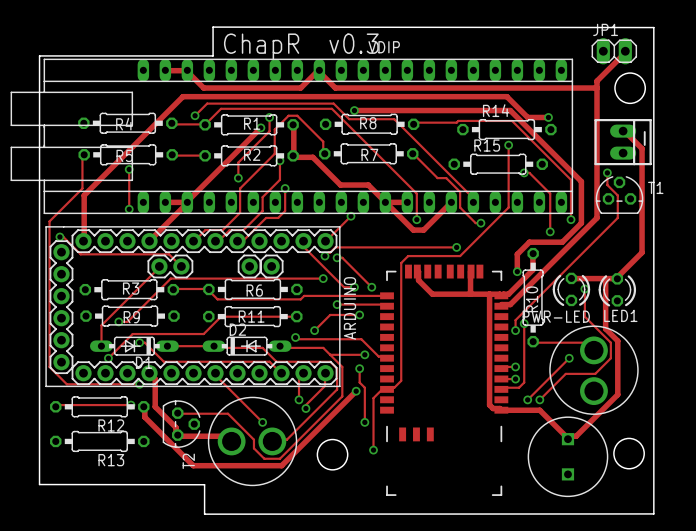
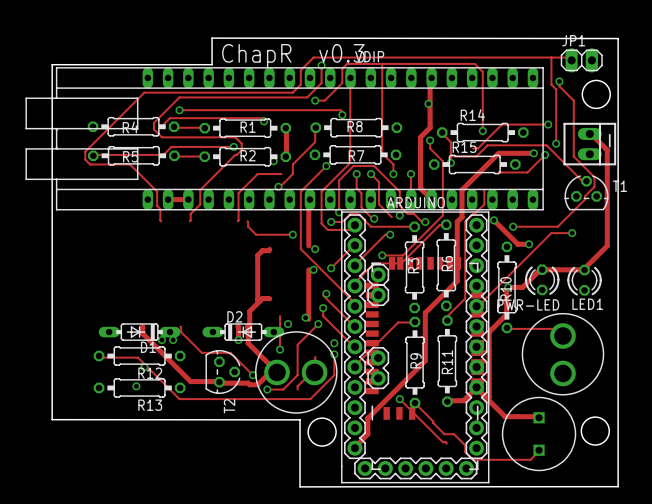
track: none -> (551, 57) (551, 84) (556, 89) (556, 143)
track: none -> (571, 60) (568, 57) (313, 57) (300, 70) (300, 84) (292, 92) (144, 92) (85, 151) (85, 159) (90, 164) (130, 164) (157, 191) (157, 205) (160, 209) (161, 221)
track: (625, 51) (597, 81) (597, 217) (510, 304) (501, 304) (501, 306) -> none
track: none -> (382, 63) (382, 153) (393, 164) (393, 174)
track: none -> (321, 65) (321, 83) (307, 97) (179, 97) (153, 122) (153, 129) (161, 137) (235, 137) (241, 143) (241, 150) (200, 190) (200, 204) (190, 213) (189, 221)
via: none -> (321, 65)
track: (165, 70) (187, 70) (203, 88) (300, 88) (319, 70) (335, 88) (597, 88) -> none
track: none -> (350, 77) (350, 162) (321, 191) (321, 223) (327, 229) (350, 229) (354, 225)
via: none -> (559, 81)
track: none -> (315, 100) (324, 100) (342, 83) (342, 68) (347, 63) (474, 63) (482, 71) (482, 130)
via: none -> (315, 100)
via: none -> (428, 103)
track: none -> (179, 110) (340, 110) (342, 111)
track: (354, 110) (510, 110) (581, 181) (581, 223) (562, 242) (529, 242) (517, 254) (517, 271) -> none
track: none -> (264, 118) (169, 118) (161, 126)
track: (195, 115) (207, 103) (333, 103) (349, 119) (394, 119) (472, 197) (473, 202) -> none
via position: (195, 115) -> (179, 110)
track: (269, 117) (269, 131) (238, 162) (238, 178) -> none
track: (548, 117) (527, 117) (506, 96) (182, 96) (84, 195) (83, 241) -> none
via: (548, 117) -> none
track: none -> (548, 124) (501, 124) (477, 148) (473, 148)
via: none -> (548, 124)
track: (205, 124) (221, 108) (331, 108) (389, 165) -> (339, 213) (339, 180) (353, 166) (374, 166)
track: none -> (315, 127) (315, 142) (292, 164) (292, 174) (281, 185)
track: (413, 124) (415, 122) (456, 122) (458, 120) (512, 120) (571, 179) (571, 219) -> none
track: (260, 127) (149, 241) -> none
via: (260, 127) -> none
track: none -> (442, 132) (450, 142) (450, 162)
track: none -> (430, 140) (430, 148) (442, 161) (442, 215) (402, 255) (382, 255)
via: none -> (430, 140)
via: none -> (556, 143)
via: none -> (233, 146)
track: (508, 145) (508, 191) -> none
via position: (508, 145) -> (482, 130)
track: none -> (533, 153) (498, 153) (462, 190) (462, 217) (457, 221) (457, 281) (425, 312) (425, 360) (367, 418) (367, 434) (354, 448)
via: none -> (533, 153)
track: (324, 153) (323, 141) (297, 115) (288, 115) (274, 129) (274, 153) (240, 188) (240, 212) (222, 230) (205, 230) (193, 241) -> none
track: (412, 153) (437, 178) (446, 178) (460, 191) (460, 207) (475, 223) (480, 223) -> none
via: none -> (545, 154)
track: (84, 154) (82, 155) (82, 188) (49, 221) (49, 366) (66, 384) (139, 384) -> (93, 155) (163, 154) (171, 146) (233, 146)
track: (293, 155) (312, 157) (340, 185) (368, 185) (385, 202) -> none
track: none -> (450, 156) (476, 156) (487, 145) (546, 145) (581, 180) (586, 181)
track: (279, 160) (279, 179) (262, 197) (262, 211) (243, 230) (229, 230) (219, 240) (215, 241) -> none
via: none -> (450, 162)
track: none -> (326, 166) (300, 191) (300, 249) (353, 301) (354, 306)
via: none -> (326, 166)
track: (129, 169) (129, 209) -> none
via: (129, 169) -> none
via: (524, 172) -> none
track: (529, 172) (550, 193) (550, 231) -> (503, 172) (527, 172) (545, 154)
track: (607, 172) (607, 185) (617, 195) (617, 198) -> (559, 81) (559, 86) (573, 100) (573, 156) (594, 177) (594, 186) (584, 196)
via: (607, 172) -> none
track: none -> (281, 174) (257, 174) (238, 193) (237, 221)
track: none -> (356, 174) (356, 188) (361, 193) (361, 207) (374, 218)
via: none -> (356, 174)
track: none -> (371, 174) (379, 182) (379, 204) (391, 217)
via: none -> (371, 174)
via: none -> (393, 174)
track: none -> (410, 174) (411, 199)
via: none -> (410, 174)
via: (238, 178) -> none
track: (285, 188) (285, 211) (278, 217) (266, 217) (243, 240) (237, 241) -> none
track: none -> (309, 199) (308, 245)
track: (385, 202) (413, 230) (423, 230) (451, 202) -> (431, 77) (430, 78) (430, 127) (420, 137) (420, 188) (431, 199)
track: (385, 202) (407, 202) -> none
track: (617, 202) (617, 217) (515, 320) (515, 330) -> (584, 199) (557, 226) (513, 226)
via: (129, 209) -> none
track: (416, 209) (416, 219) -> (399, 205) (407, 213) (414, 213) (422, 221) (425, 221)
track: (350, 216) (325, 241) -> none
track: (498, 217) (460, 256) (408, 256) (401, 263) (401, 380) (394, 387) (382, 389) (373, 398) (373, 450) -> (474, 213) (465, 221) (465, 298) (447, 316) (447, 320)
via: (571, 219) -> none
via: none -> (374, 218)
via: (480, 223) -> none
track: none -> (493, 220) (517, 244) (529, 244)
via: none -> (493, 220)
track: none -> (247, 221) (248, 226) (256, 234) (292, 234)
track: none -> (331, 221) (342, 221) (350, 213) (358, 213) (371, 226) (414, 226)
via: none -> (331, 221)
via: none -> (425, 221)
track: none -> (446, 224) (439, 225) (401, 263) (374, 263) (355, 282) (354, 286)
via: none -> (513, 226)
via: (550, 231) -> none
track: (59, 237) (63, 237) (80, 254) (169, 254) (181, 266) -> none
via: (59, 237) -> none
track: none -> (572, 233) (551, 233) (476, 306)
via: none -> (572, 233)
via: none -> (292, 234)
track: none -> (390, 234) (385, 234) (354, 265)
via: none -> (390, 234)
track: (303, 241) (304, 247) (344, 287) (354, 287) -> none
track: (456, 247) (335, 247) (325, 256) -> none
via: (456, 247) -> none
via: none -> (529, 244)
track: none -> (354, 245) (331, 268)
track: (533, 253) (532, 269) (508, 294) (501, 295) (499, 294) (432, 294) (418, 280) (417, 271) -> none
track: none -> (269, 249) (262, 250) (257, 255) (257, 300) (259, 301)
track: (337, 257) (342, 257) (371, 287) -> none
via: (337, 257) -> none
via: none -> (382, 255)
track: (159, 266) (101, 325) (101, 346) -> none
track: (471, 271) (470, 294) -> none
via: (517, 271) -> none
via: none -> (331, 268)
track: none -> (308, 269) (308, 319)
track: (323, 278) (170, 278) (127, 321) (118, 321) -> none
track: none -> (542, 269) (522, 287) (506, 288) (506, 314) (489, 332) (489, 397) (487, 399)
track: (605, 278) (605, 328) (617, 340) (617, 394) (576, 436) (569, 436) (567, 439) -> none
via: (354, 287) -> none
via: (371, 287) -> none
track: (584, 288) (584, 316) (610, 342) (610, 358) (595, 373) (565, 373) (539, 399) -> none
via: (584, 288) -> none
R3 rotation: 0° (129, 289) -> 90° clockwise (414, 267)
R3 position: (129, 289) -> (414, 267)
track: (173, 289) (207, 288) (217, 299) (300, 299) (304, 295) (387, 295) -> none
R6 rotation: 0° (252, 289) -> 90° clockwise (446, 265)
R6 position: (252, 289) -> (446, 265)
track: (489, 294) (489, 405) (493, 408) (501, 410) (539, 410) (567, 437) -> (447, 401) (463, 400) (476, 387) (505, 416) (538, 416)
via: none -> (508, 287)
track: (337, 304) (385, 304) (387, 306) -> none
ARDUINO: (192, 306) -> none
track: none -> (323, 295) (354, 326)
track: none -> (269, 298) (262, 298) (249, 311) (249, 325) (247, 326) (248, 343) (277, 372) (272, 370) (257, 384) (190, 381) (142, 333) (142, 326)
track: (359, 314) (330, 314) (314, 330) -> none
via: (359, 314) -> none
R9 rotation: 0° (130, 316) -> 90° clockwise (415, 362)
R9 position: (130, 316) -> (415, 362)
R11 rotation: 0° (252, 316) -> 90° clockwise (447, 361)
R11 position: (252, 316) -> (447, 361)
track: (296, 316) (221, 316) (203, 334) (132, 334) (108, 358) -> none
track: none -> (323, 308) (323, 316) (354, 346)
via: none -> (323, 308)
via: (118, 321) -> none
track: (524, 323) (524, 382) (519, 387) (501, 387) (501, 389) -> none
via: (524, 323) -> none
track: none -> (280, 316) (280, 349)
via: (515, 330) -> none
track: none -> (415, 322) (398, 322) (354, 367)
track: (295, 337) (297, 339) (361, 339) (378, 356) (387, 358) -> none
track: none -> (318, 324) (297, 344) (297, 375) (283, 389) (267, 389)
via: none -> (318, 324)
track: none -> (180, 326) (181, 332) (201, 352) (230, 352) (252, 375)
track: none -> (237, 326) (238, 340)
track: (139, 342) (144, 342) (163, 361) (269, 361) (281, 373) -> none
via: (139, 342) -> none
track: (167, 346) (262, 347) (276, 361) (330, 361) (337, 368) (337, 389) (286, 439) (273, 439) (272, 441) -> none
track: (280, 346) (281, 347) (323, 347) (342, 366) (342, 396) -> (334, 354) (334, 375) (331, 378)
via: none -> (161, 340)
via: none -> (173, 340)
via: none -> (238, 340)
track: (330, 354) (364, 354) -> none
via: (364, 354) -> none
via: (108, 358) -> none
via: none -> (334, 343)
track: (569, 358) (527, 399) -> none
via: (569, 358) -> none
ARDUINO: none -> (415, 347)
via: none -> (280, 349)
via: (515, 366) -> none
track: (359, 368) (359, 382) (364, 387) (364, 422) -> none
via: (359, 368) -> none
via: none -> (334, 354)
track: (149, 373) (155, 379) (155, 406) (176, 427) (177, 435) (227, 436) (231, 441) -> none
track: (215, 373) (214, 373) (262, 422) -> none
track: (303, 373) (299, 377) (299, 399) -> none
via: (515, 379) -> none
track: (356, 391) (281, 465) (193, 465) (144, 417) (143, 406) -> none
via: (356, 391) -> none
via: none -> (252, 375)
via: (299, 399) -> none
via: (527, 399) -> none
via: (539, 399) -> none
track: (130, 405) (56, 405) (55, 406) -> none
R12 position: (99, 406) -> (139, 356)
via: none -> (267, 389)
via: (305, 408) -> none
track: (177, 413) (227, 413) (253, 439) (253, 448) (264, 458) (279, 458) (319, 418) -> (99, 356) (99, 357) (138, 357) (179, 399) (310, 399)
track: none -> (399, 399) (442, 442) (446, 443)
via: none -> (399, 399)
via: (262, 422) -> none
via: (364, 422) -> none
track: none -> (415, 403) (444, 434) (454, 434) (465, 445) (465, 451) (473, 459) (530, 459) (539, 450)
T2 position: (181, 424) -> (222, 371)
board edge: (39, 441) (39, 484) (204, 484) (204, 514) (653, 513) -> (52, 419) (300, 419) (300, 486) (618, 486)
R13 position: (99, 441) -> (139, 387)
part position: (252, 441) -> (296, 372)
via: (373, 450) -> none

